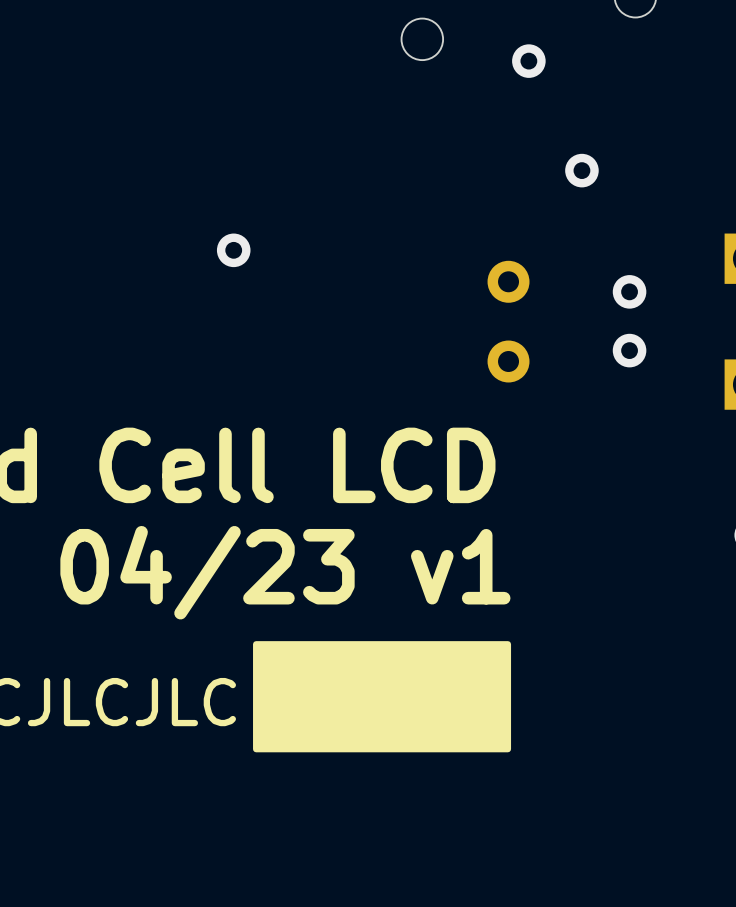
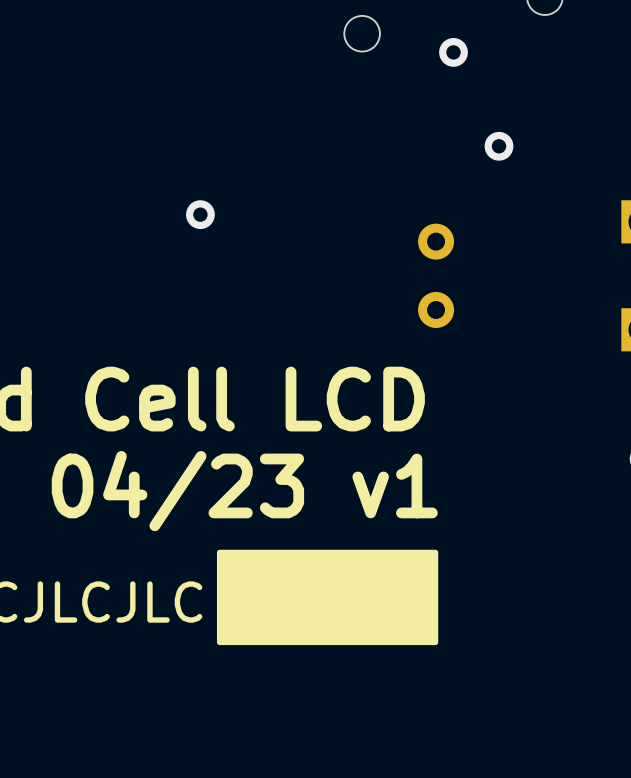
via: (629, 291) -> none
via: (629, 350) -> none

